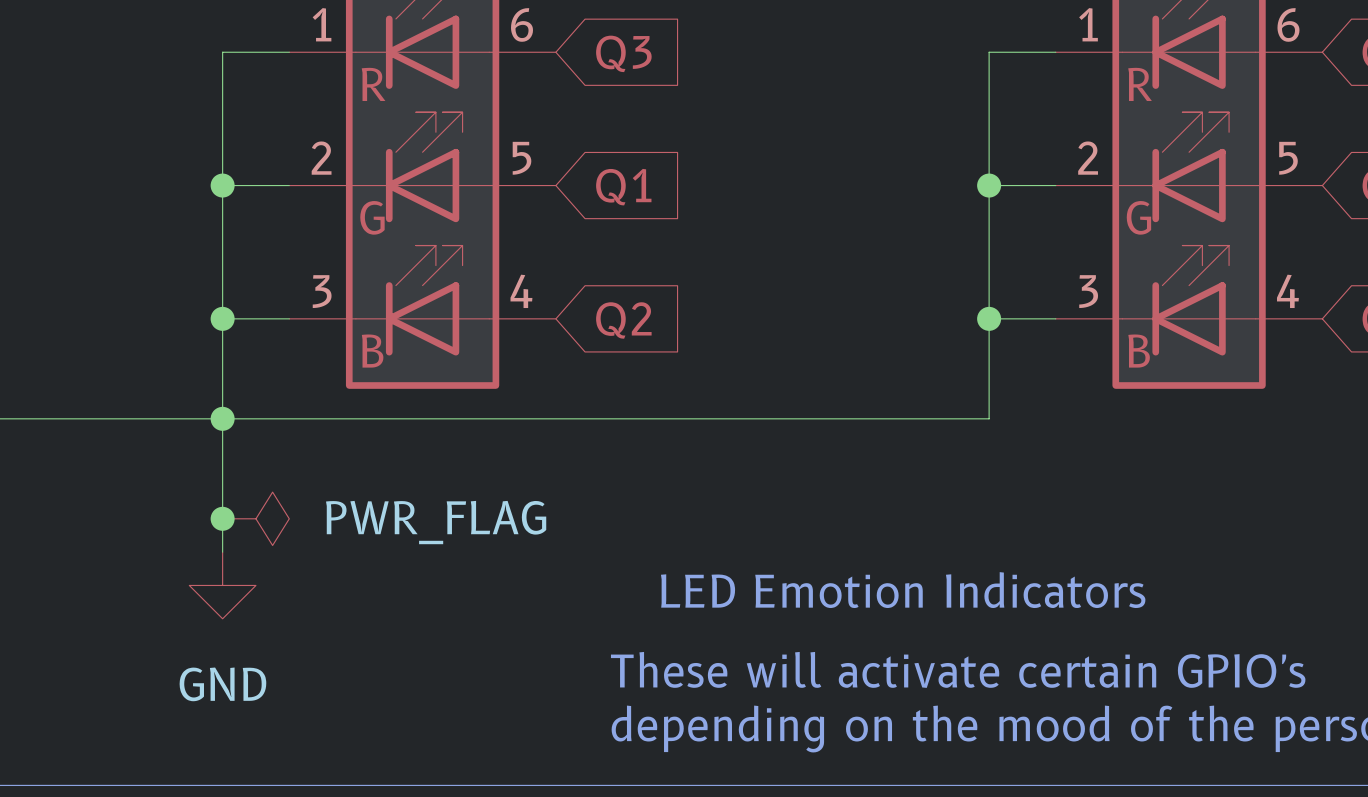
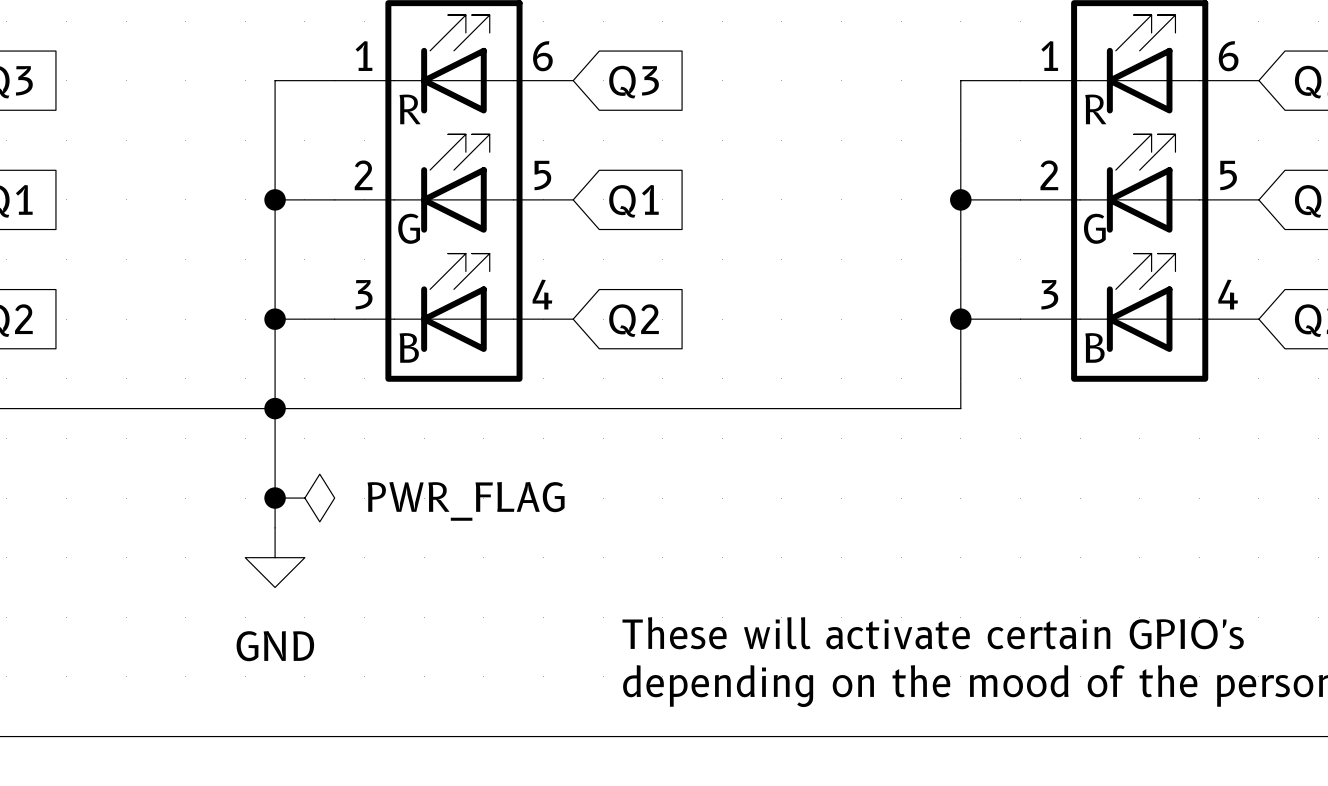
text: LED Emotion Indicators (903, 590) -> none

